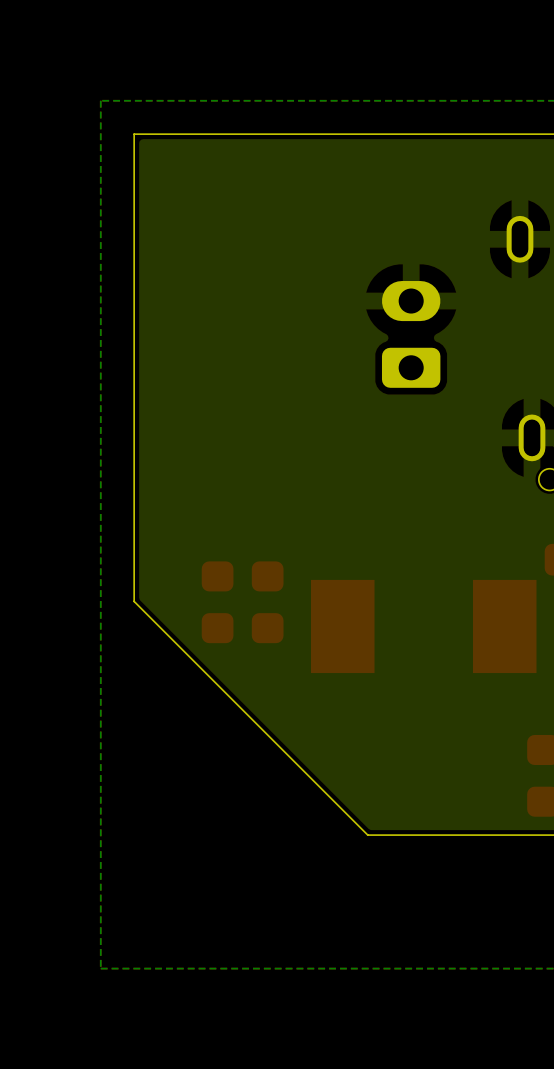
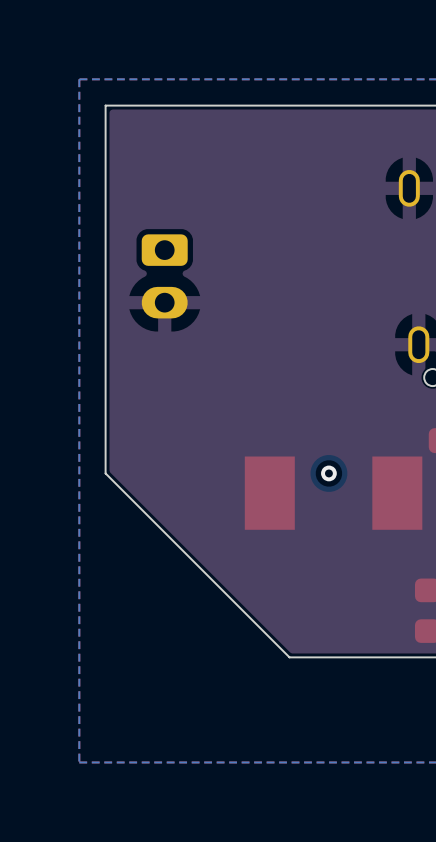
part rotation: 0° (411, 334) -> 180° (164, 276)
part position: (411, 334) -> (164, 276)
via: none -> (328, 473)
part: (217, 602) -> none
part: (267, 602) -> none

